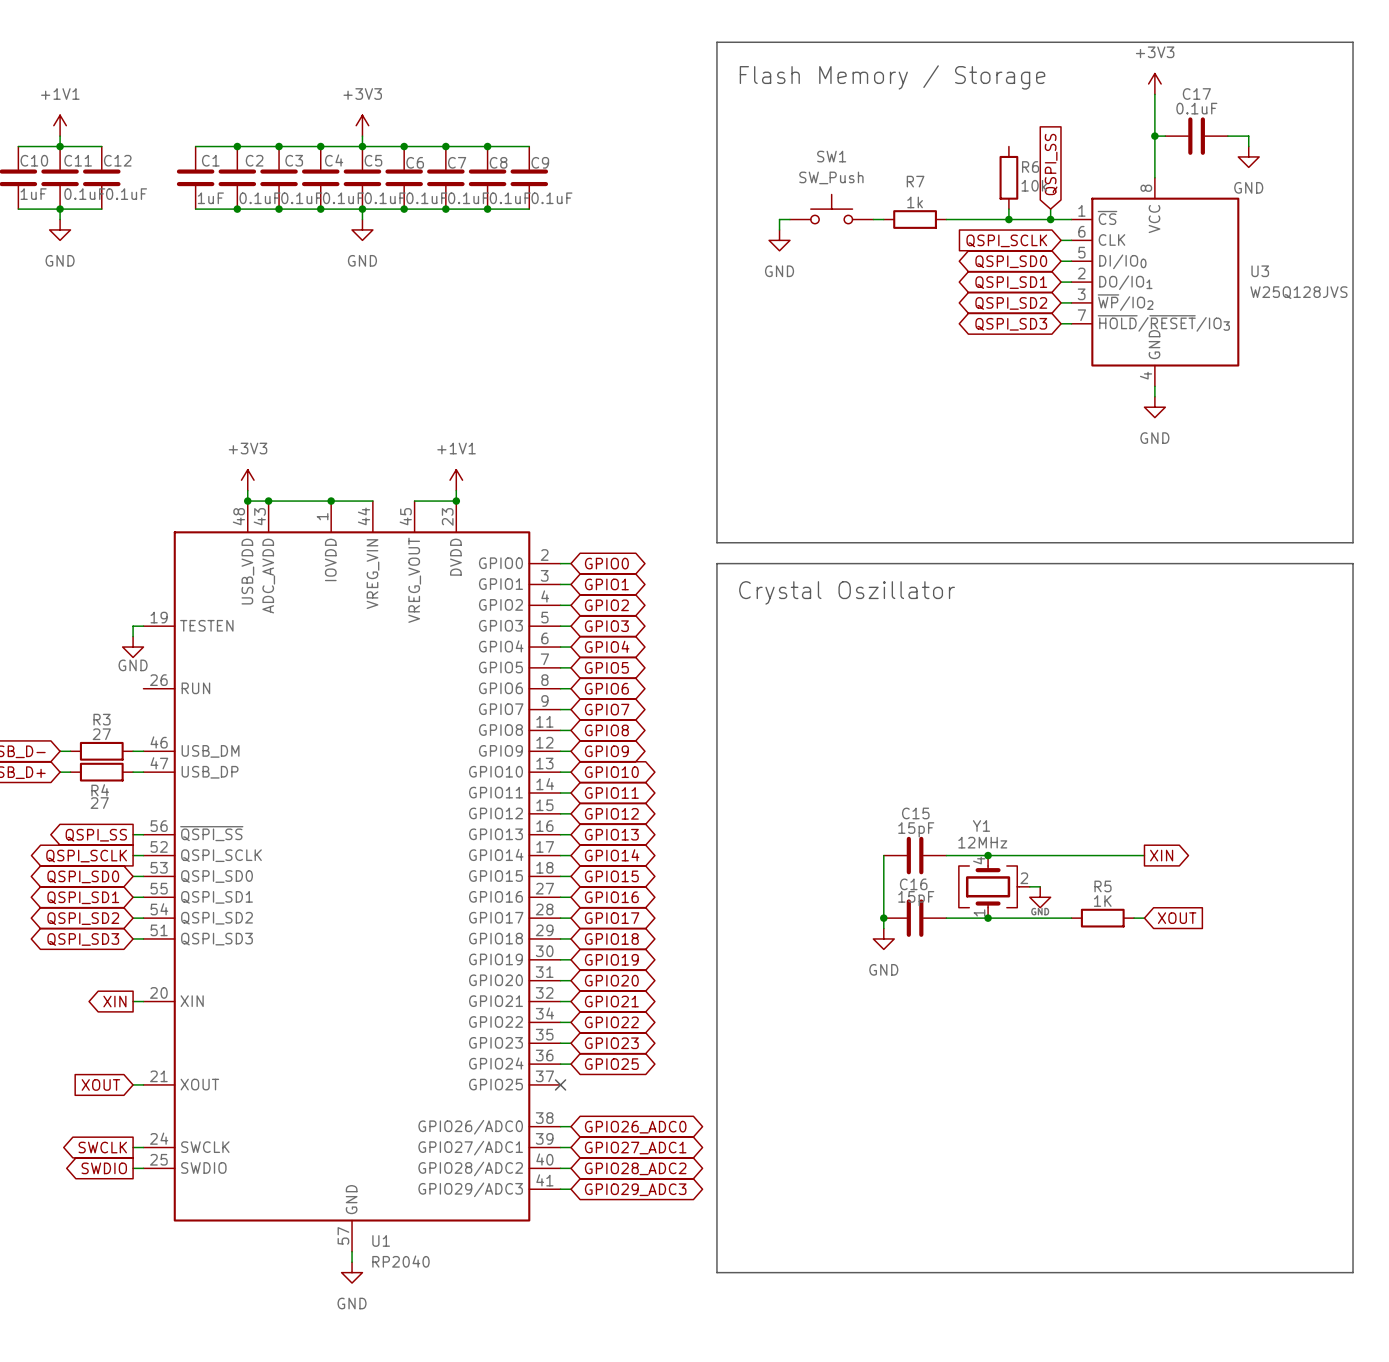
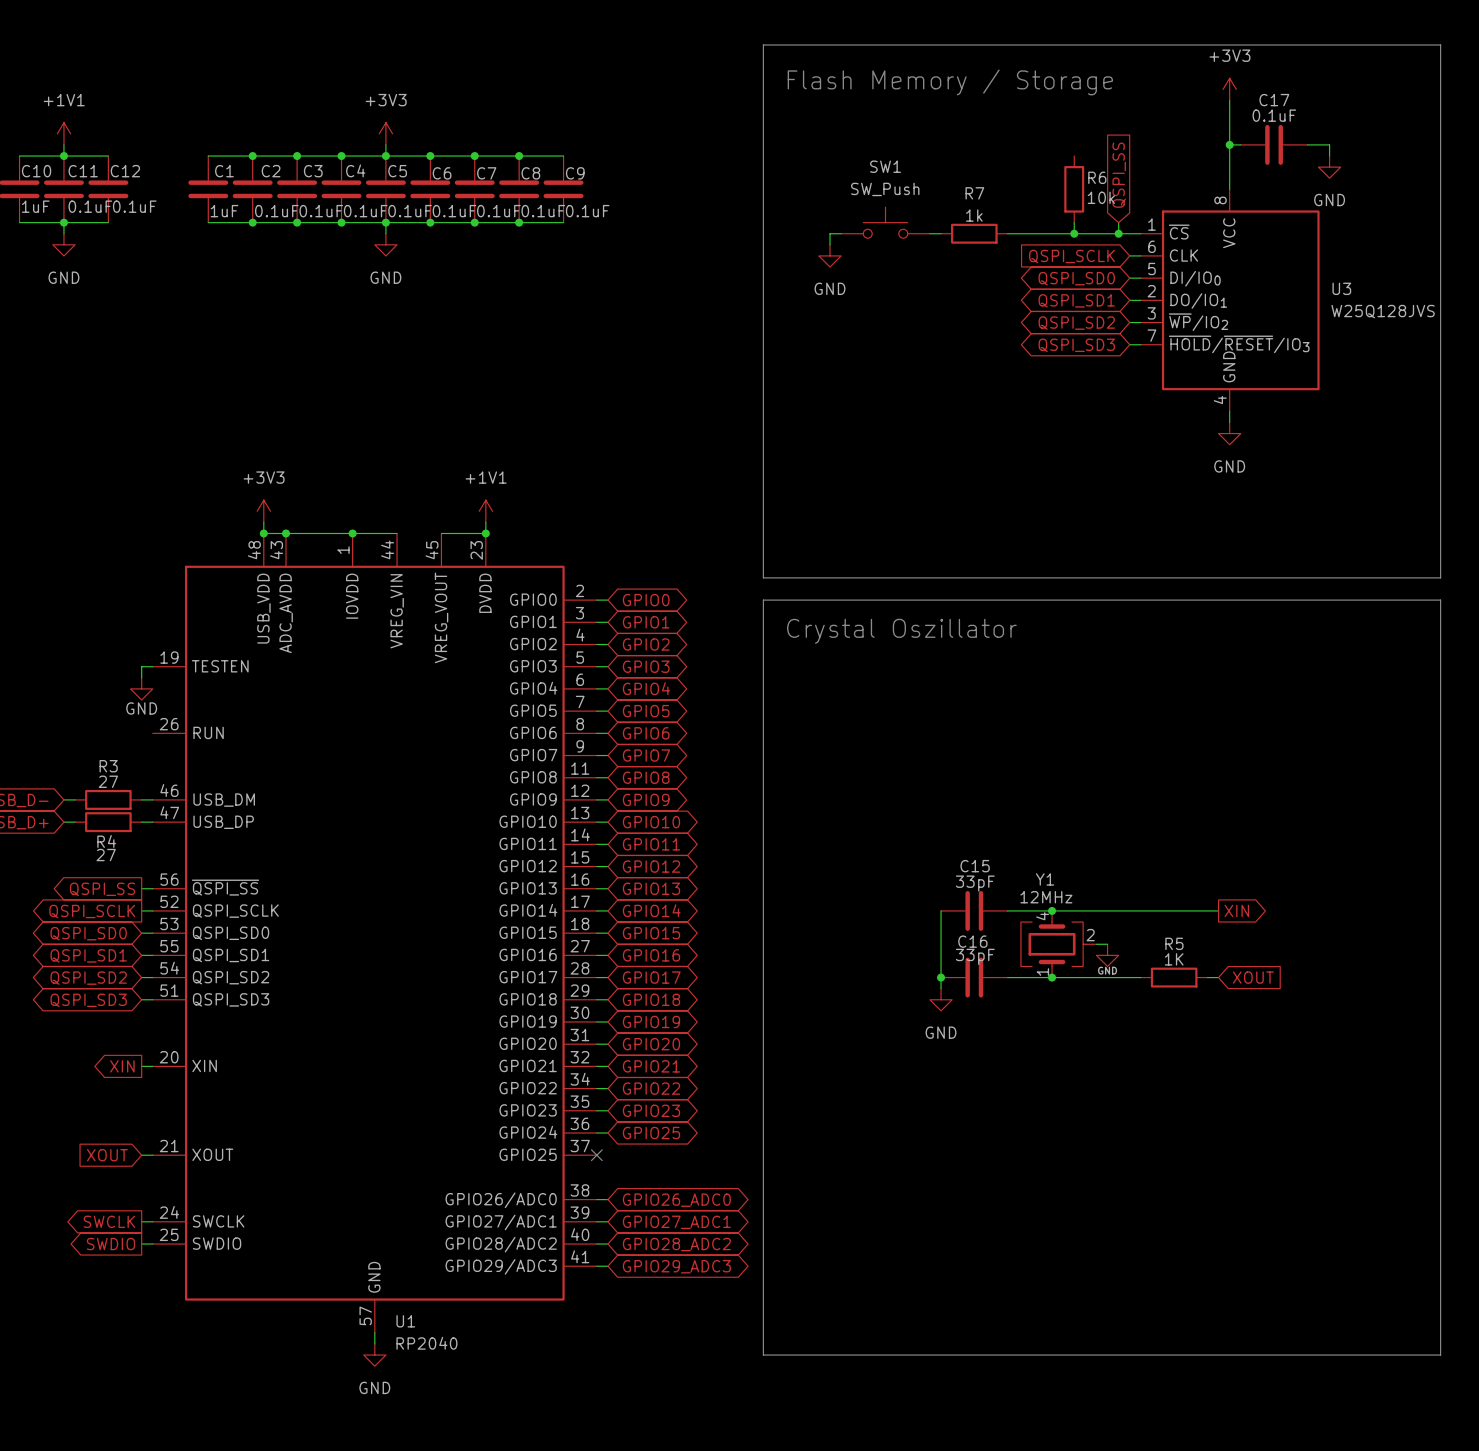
C15 value: 15pF (916, 829) -> 33pF (975, 883)
C16 value: 15pF (916, 898) -> 33pF (975, 956)

